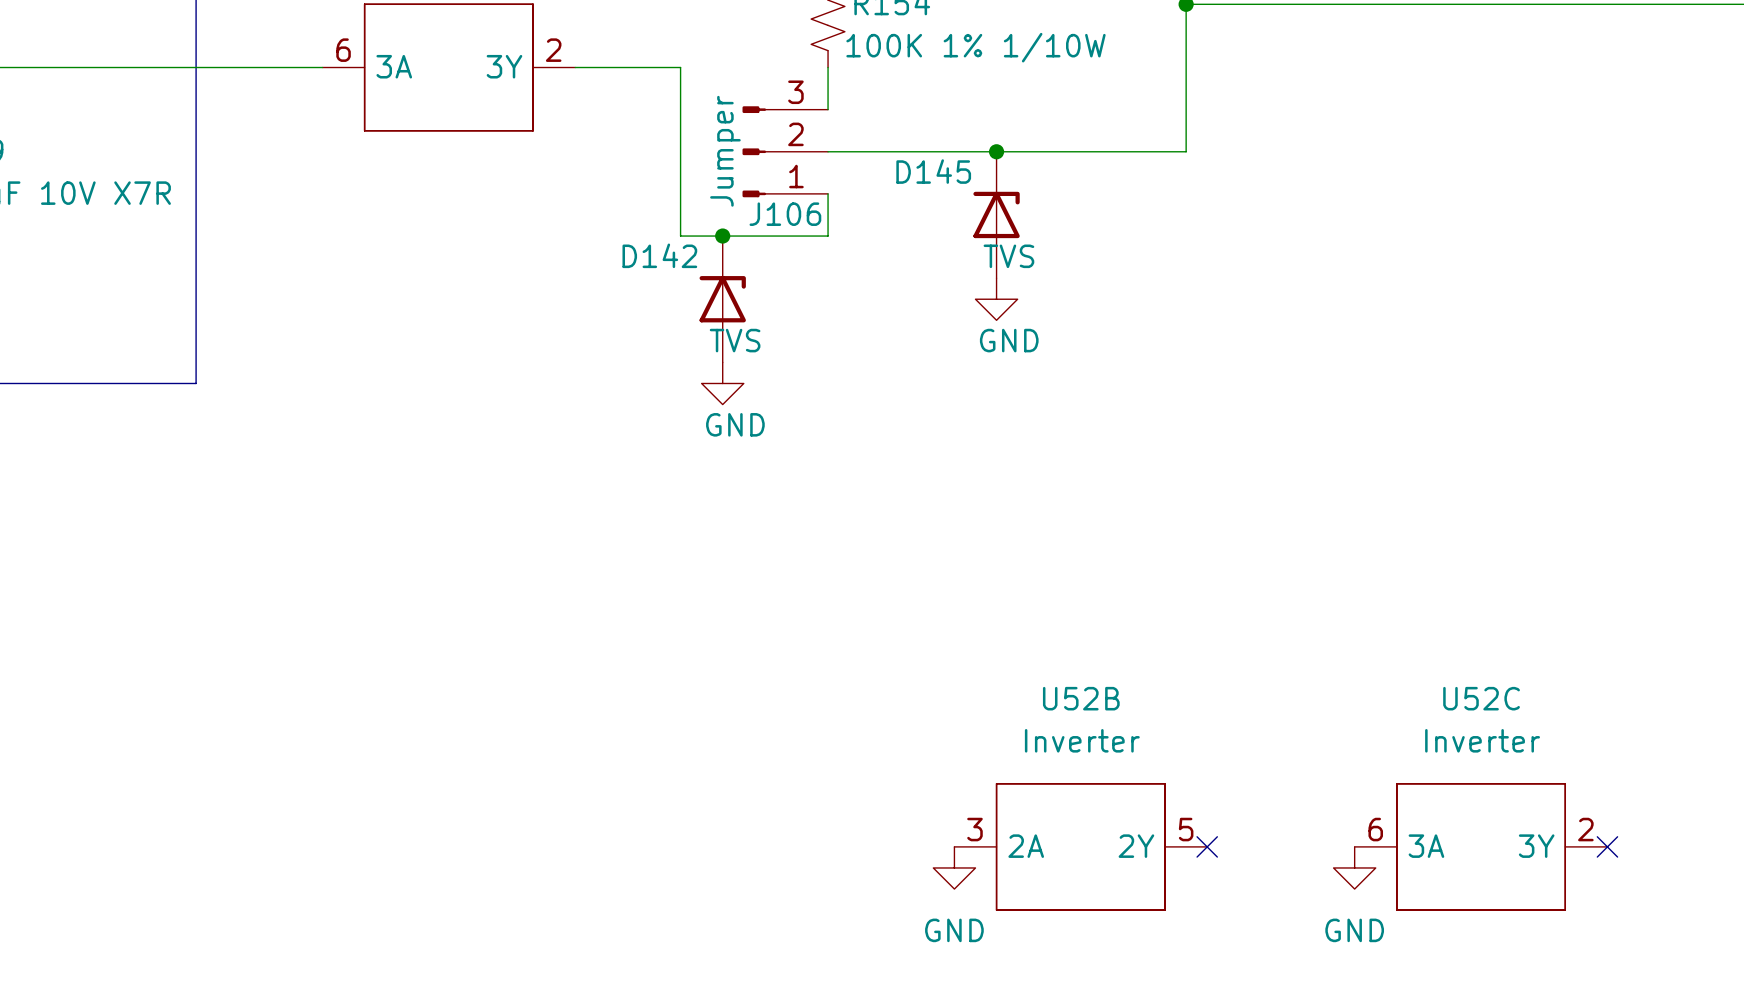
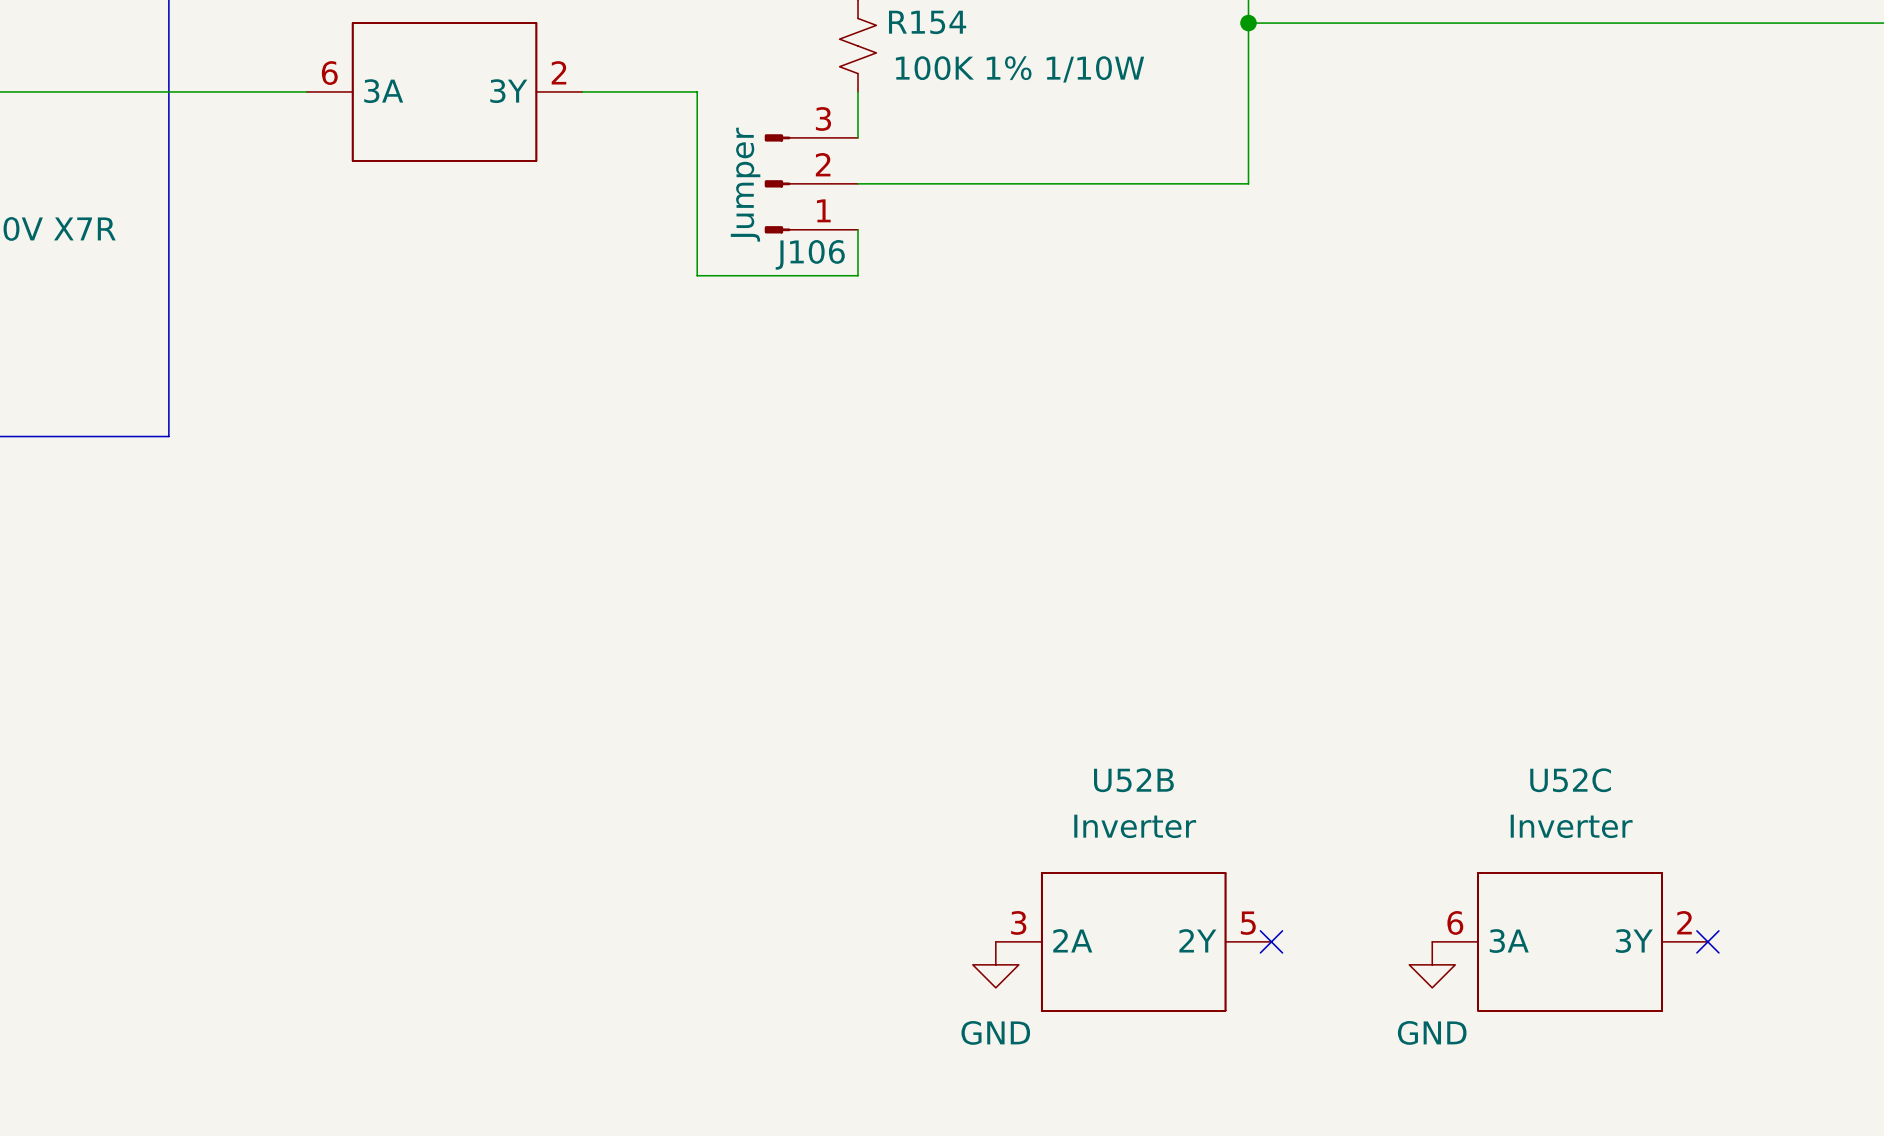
junction: (996, 151) -> none
D145: TVS (996, 214) -> none
junction: (722, 236) -> none
D142: TVS (722, 299) -> none
power symbol: GND (996, 299) -> none
power symbol: GND (722, 383) -> none

